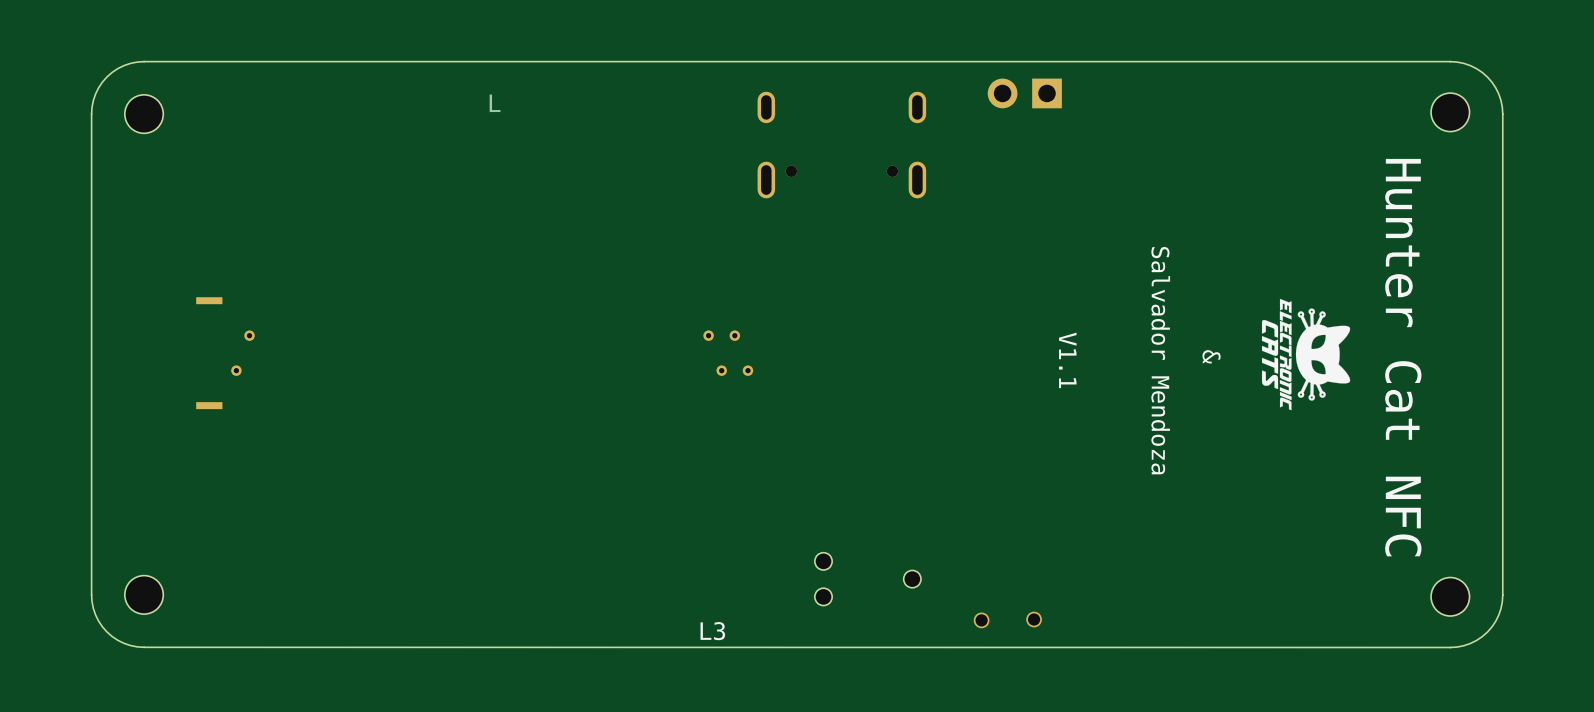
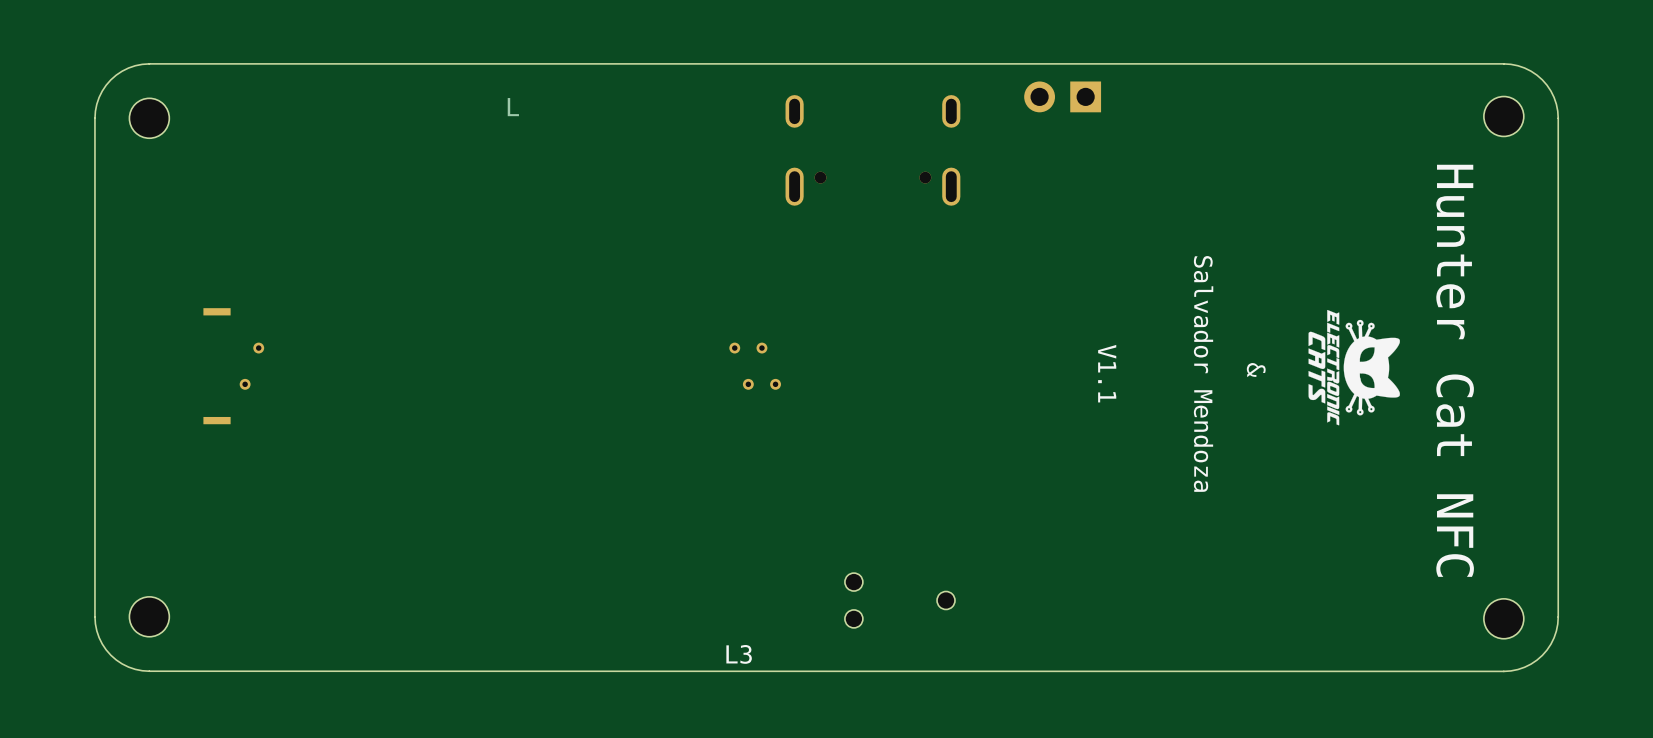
part: (1007, 619) -> none

